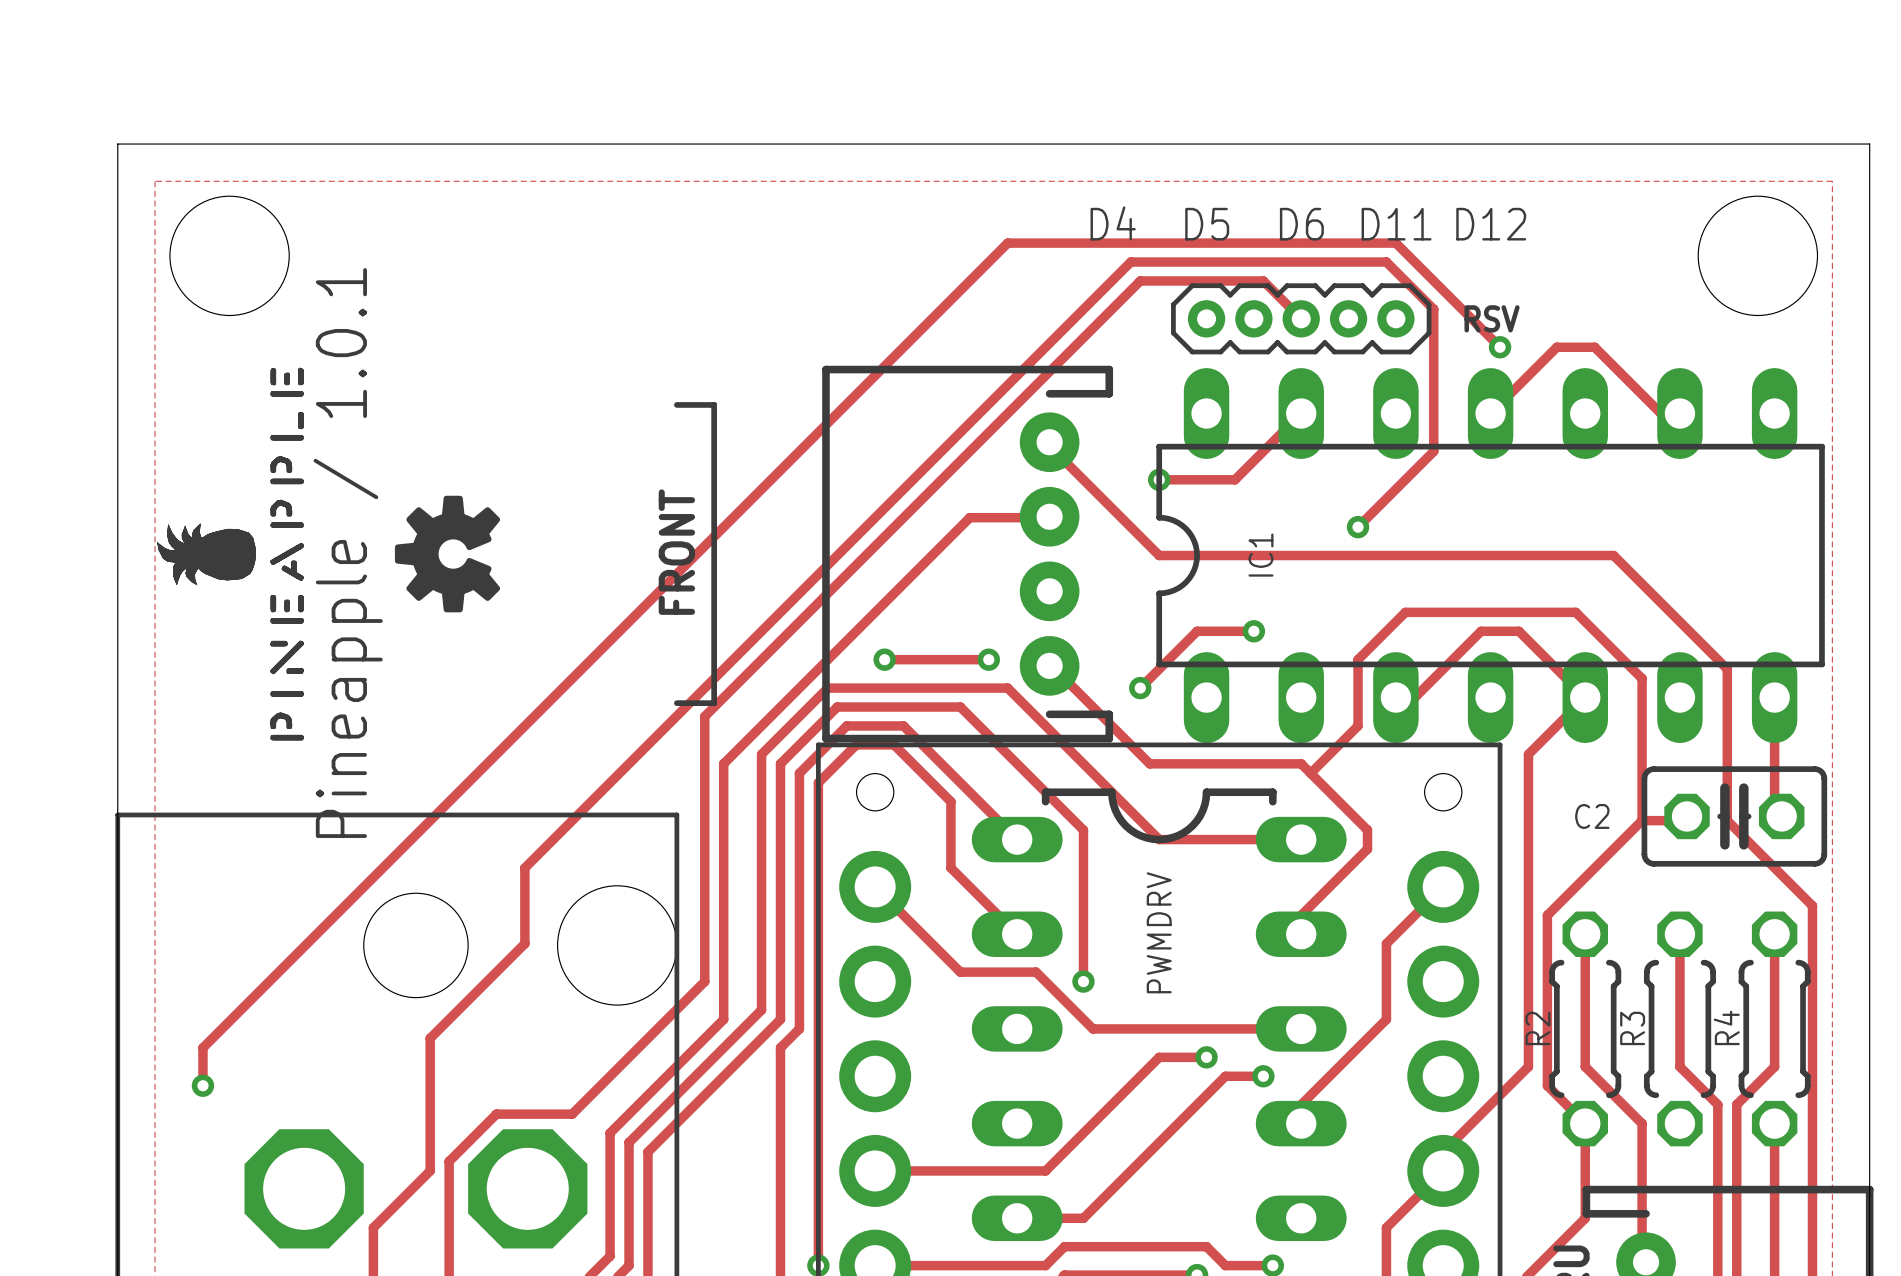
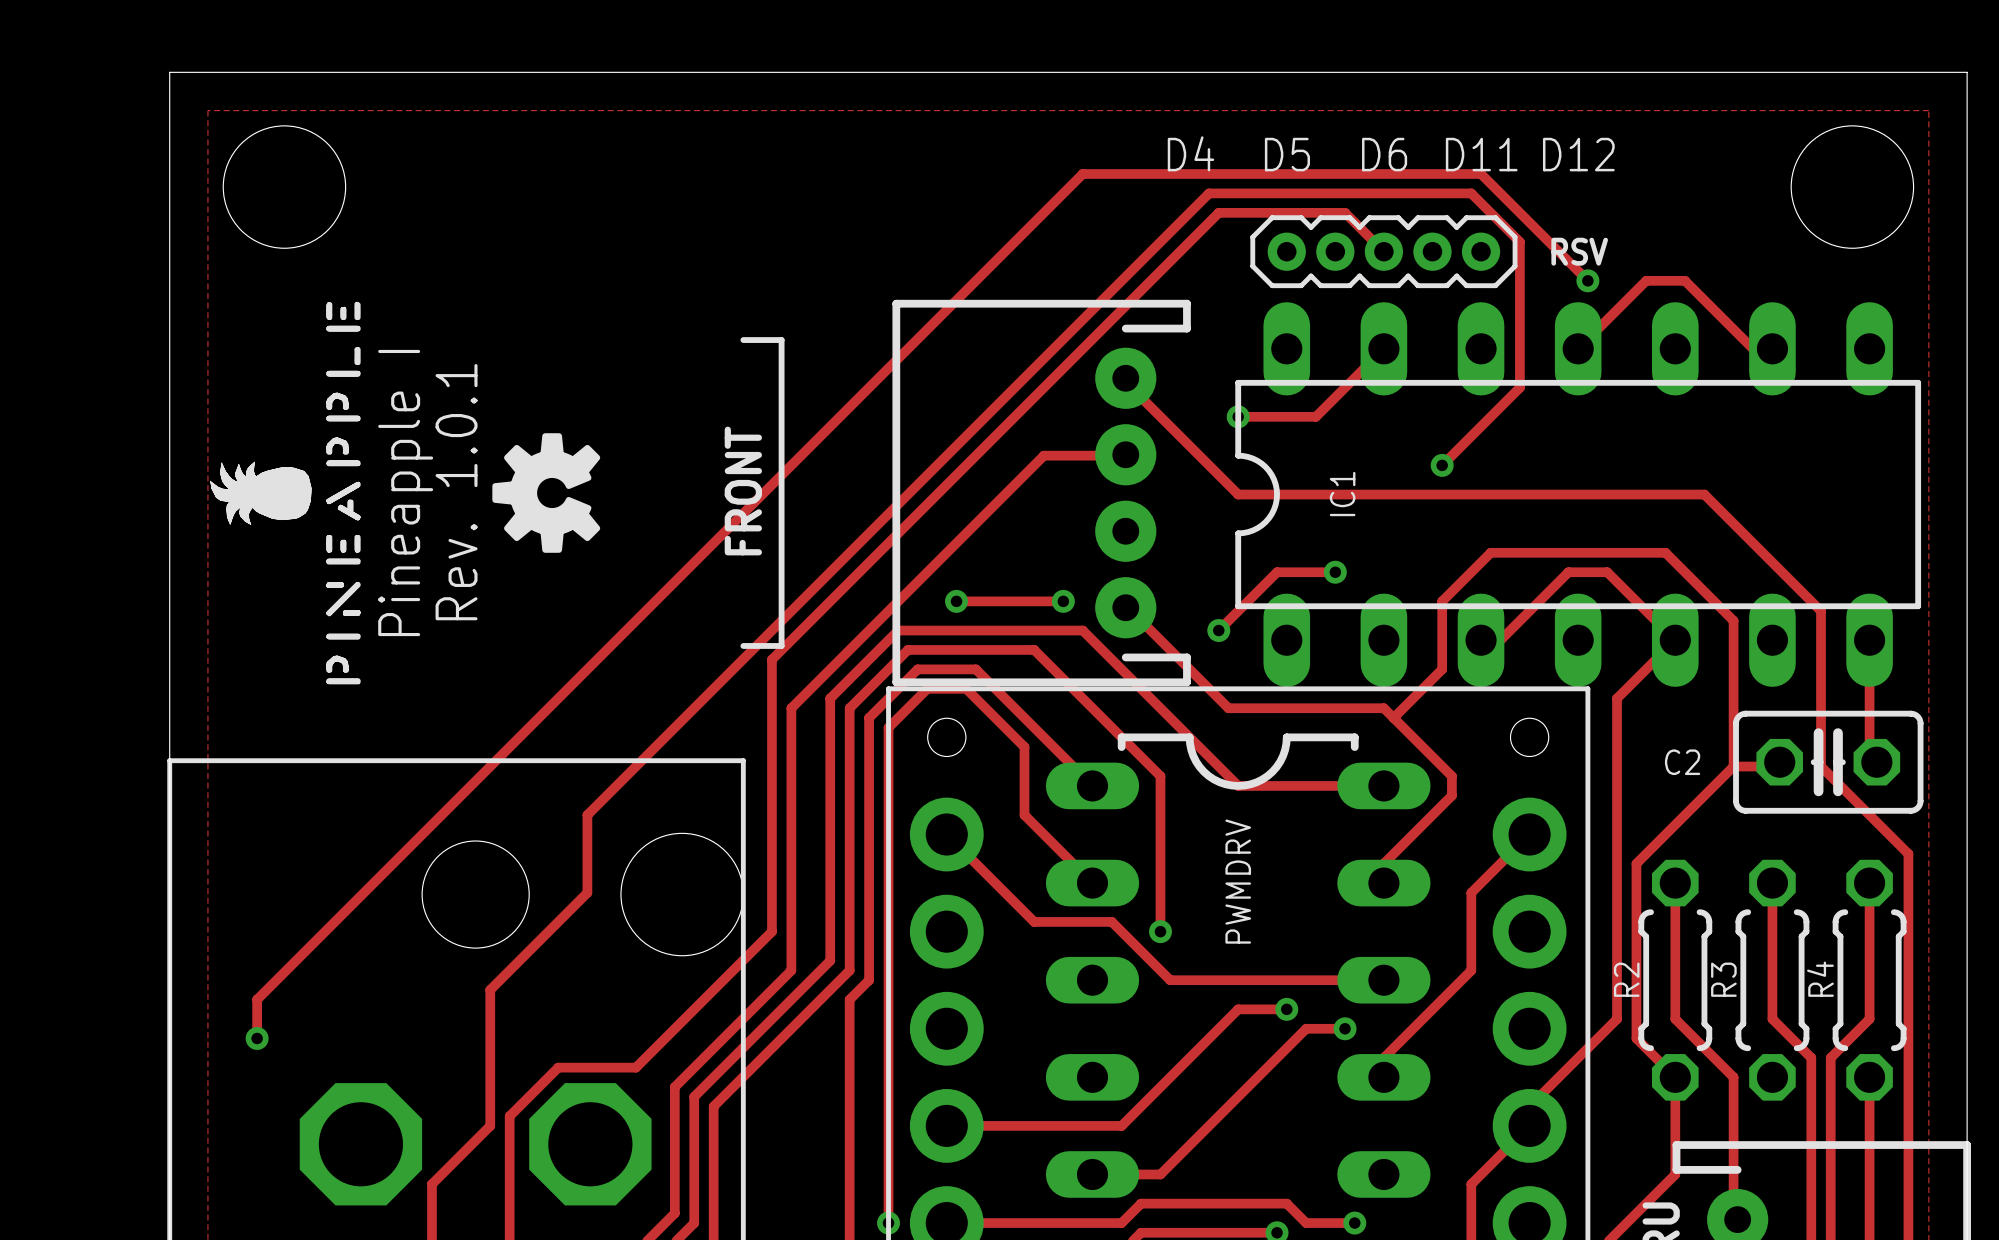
text: Pineapple / 1.0.1 (348, 553) -> Pineapple I (405, 493)
text: none -> Rev. 1.0.1 (456, 492)
drawing position: (447, 554) -> (546, 493)

